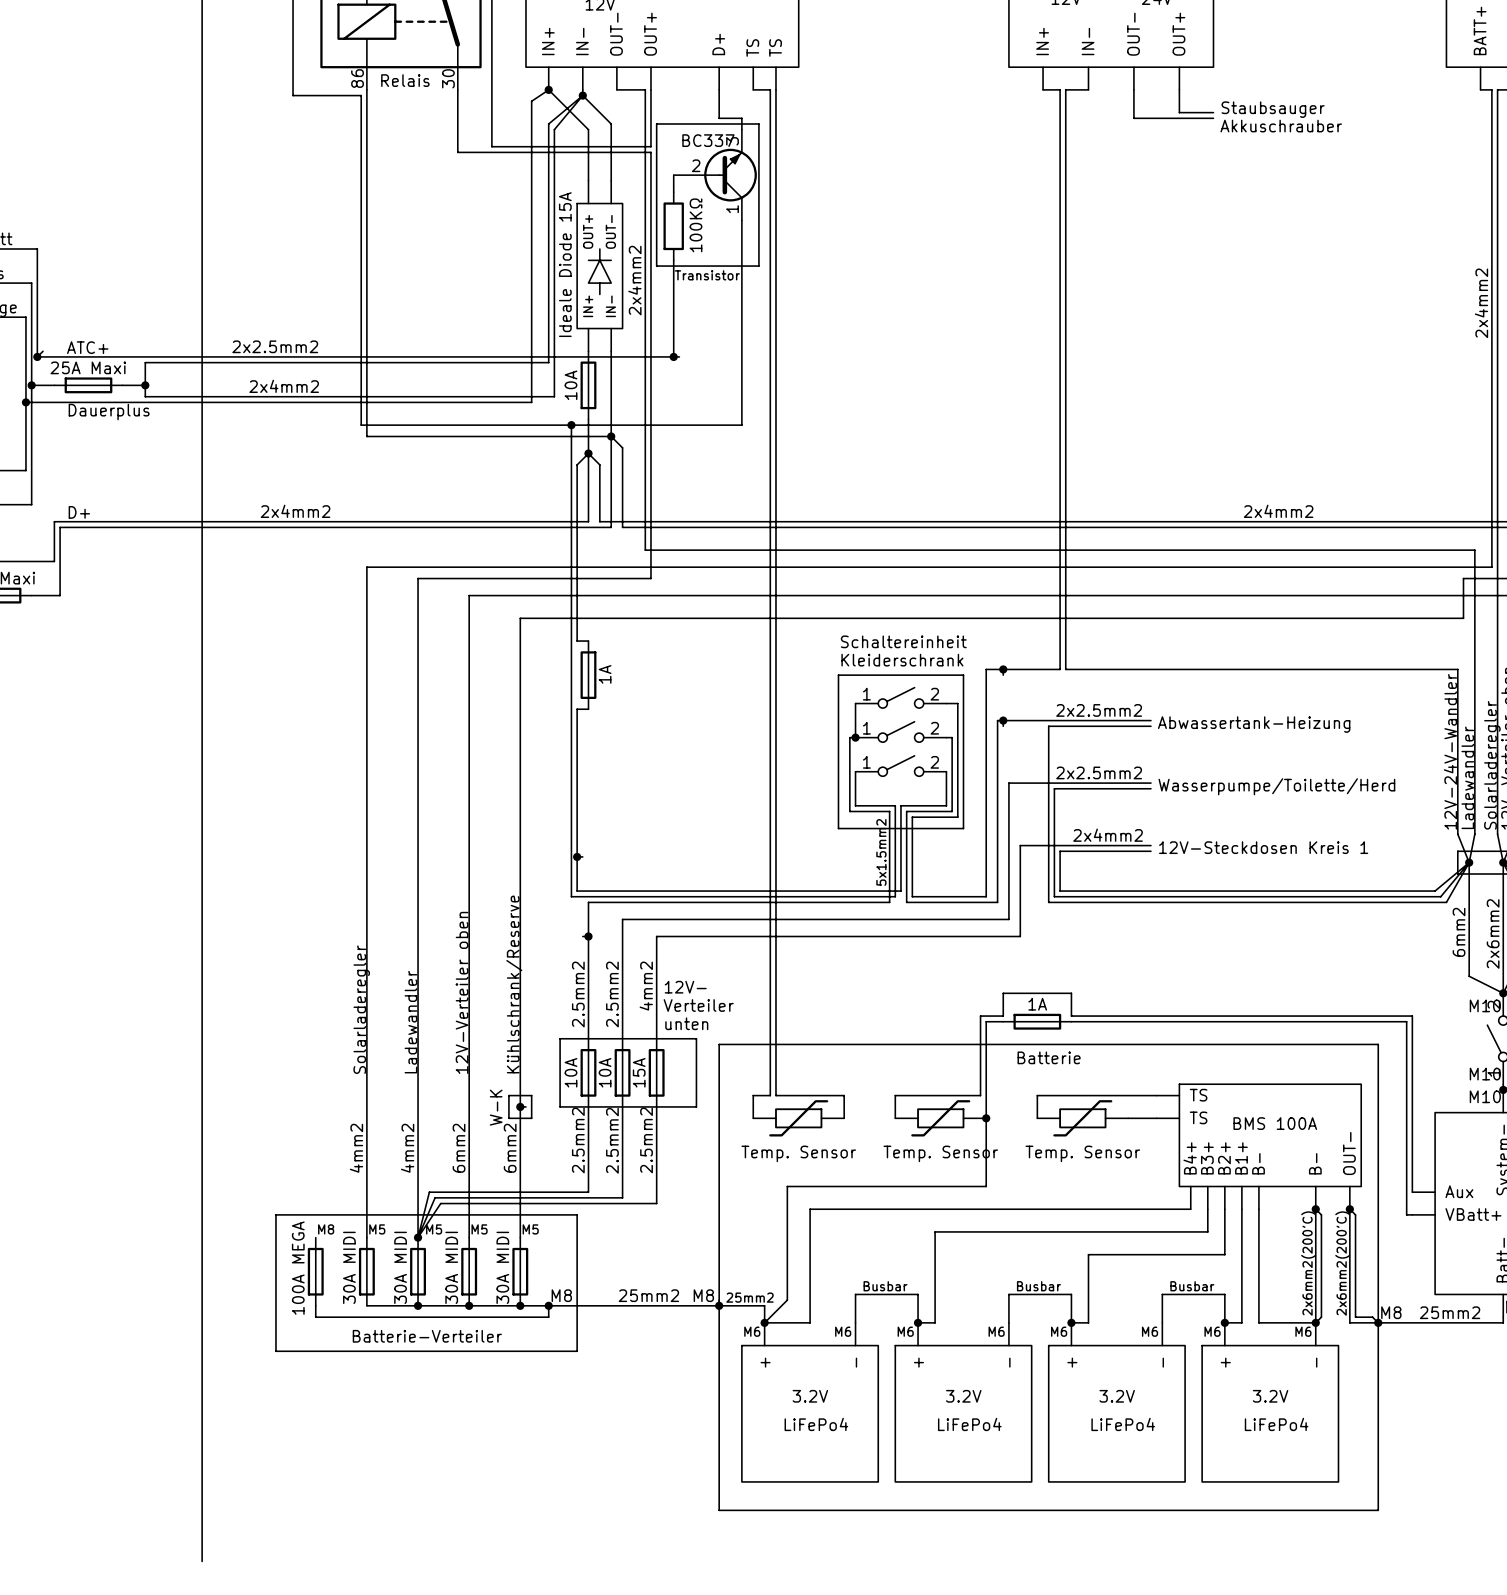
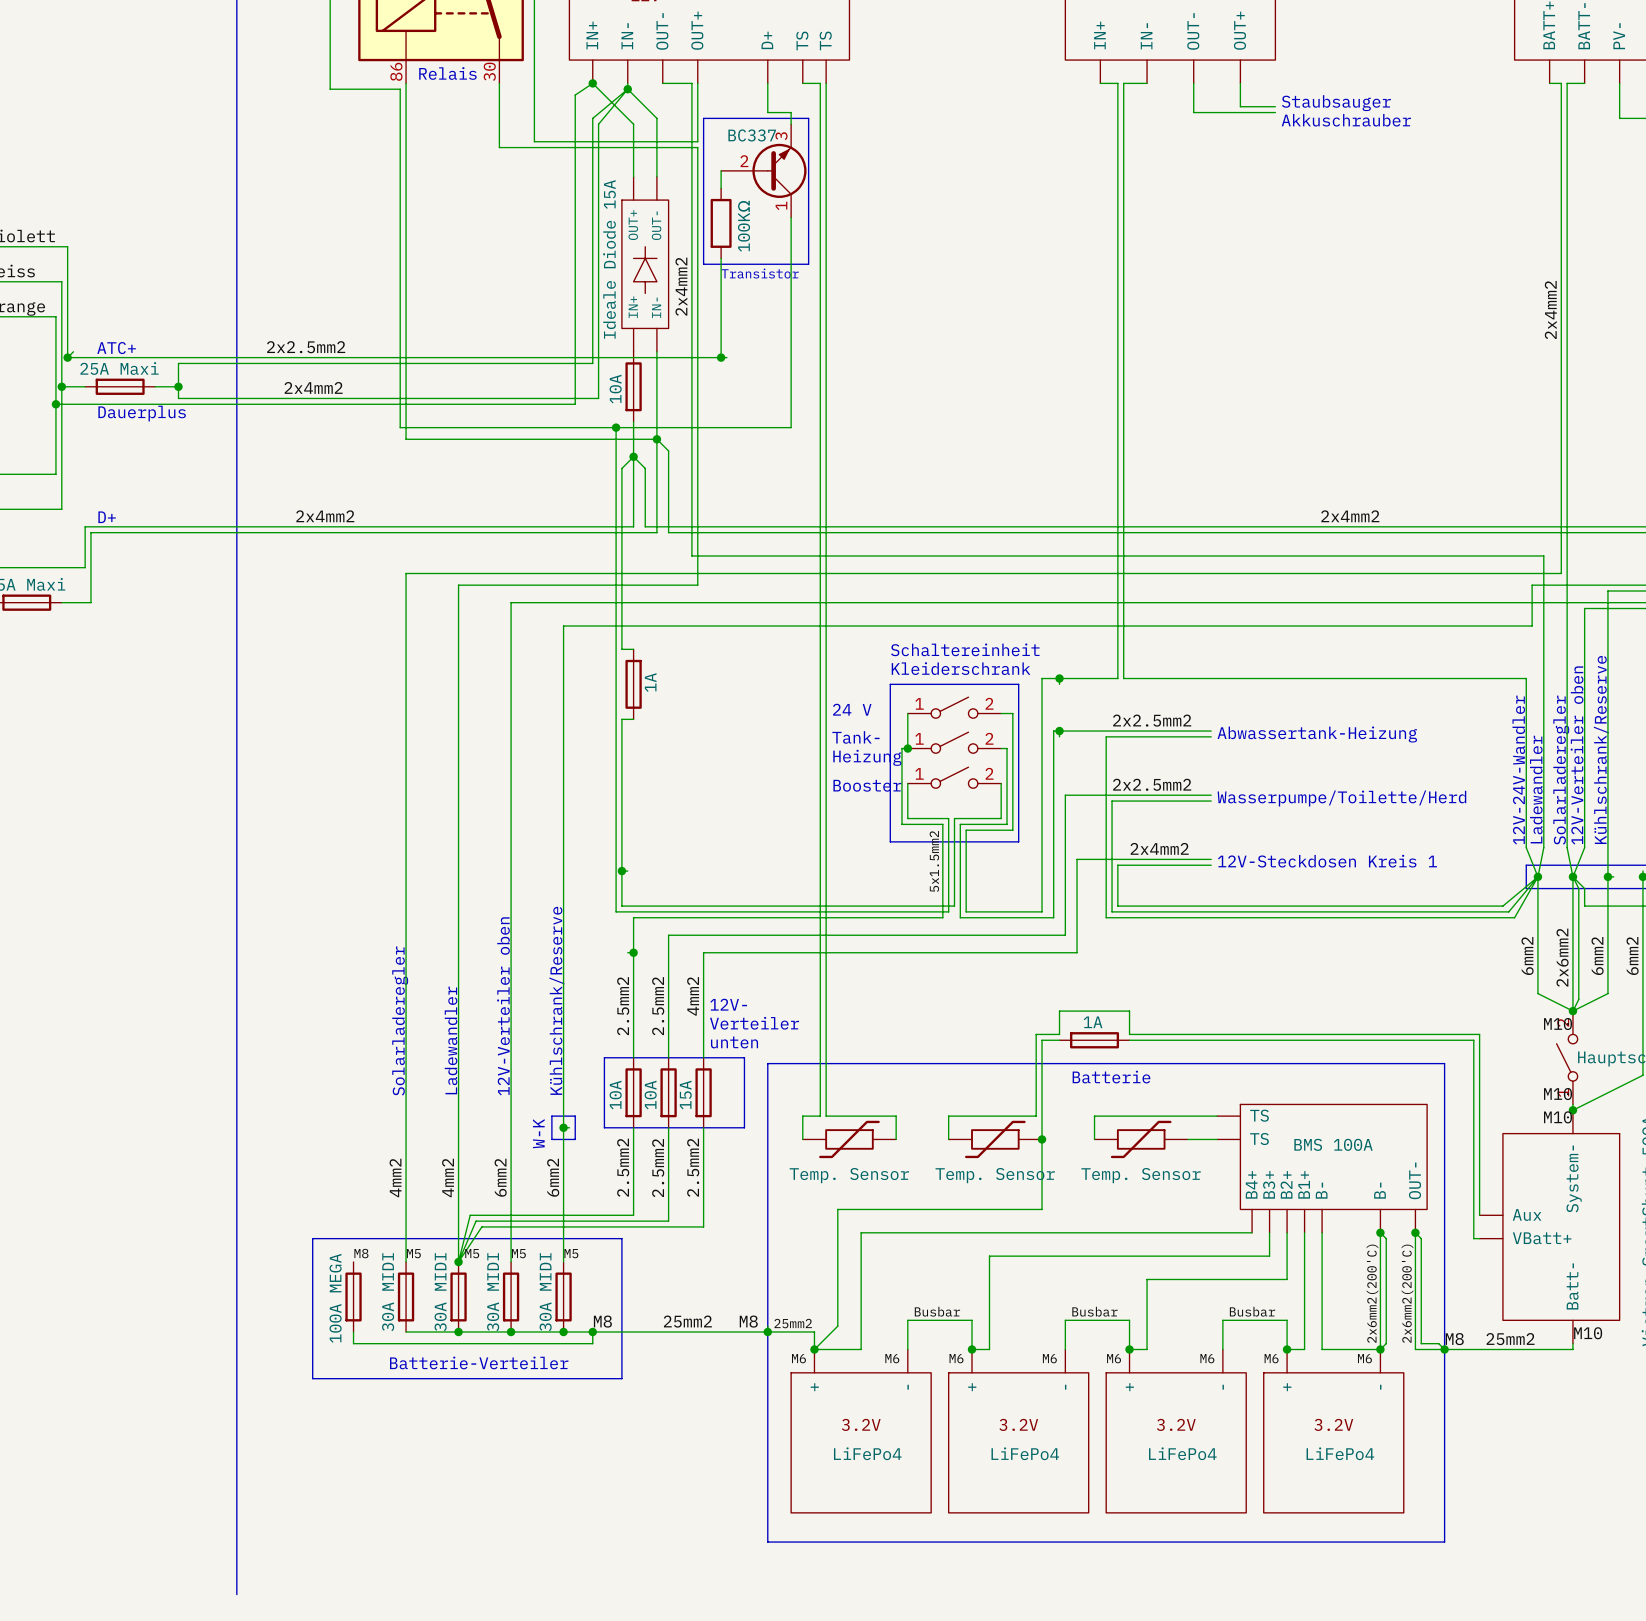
text: none -> 24 V (852, 709)
text: none -> Tank- (855, 737)
text: none -> Heizung (867, 757)
text: none -> Booster (867, 785)

